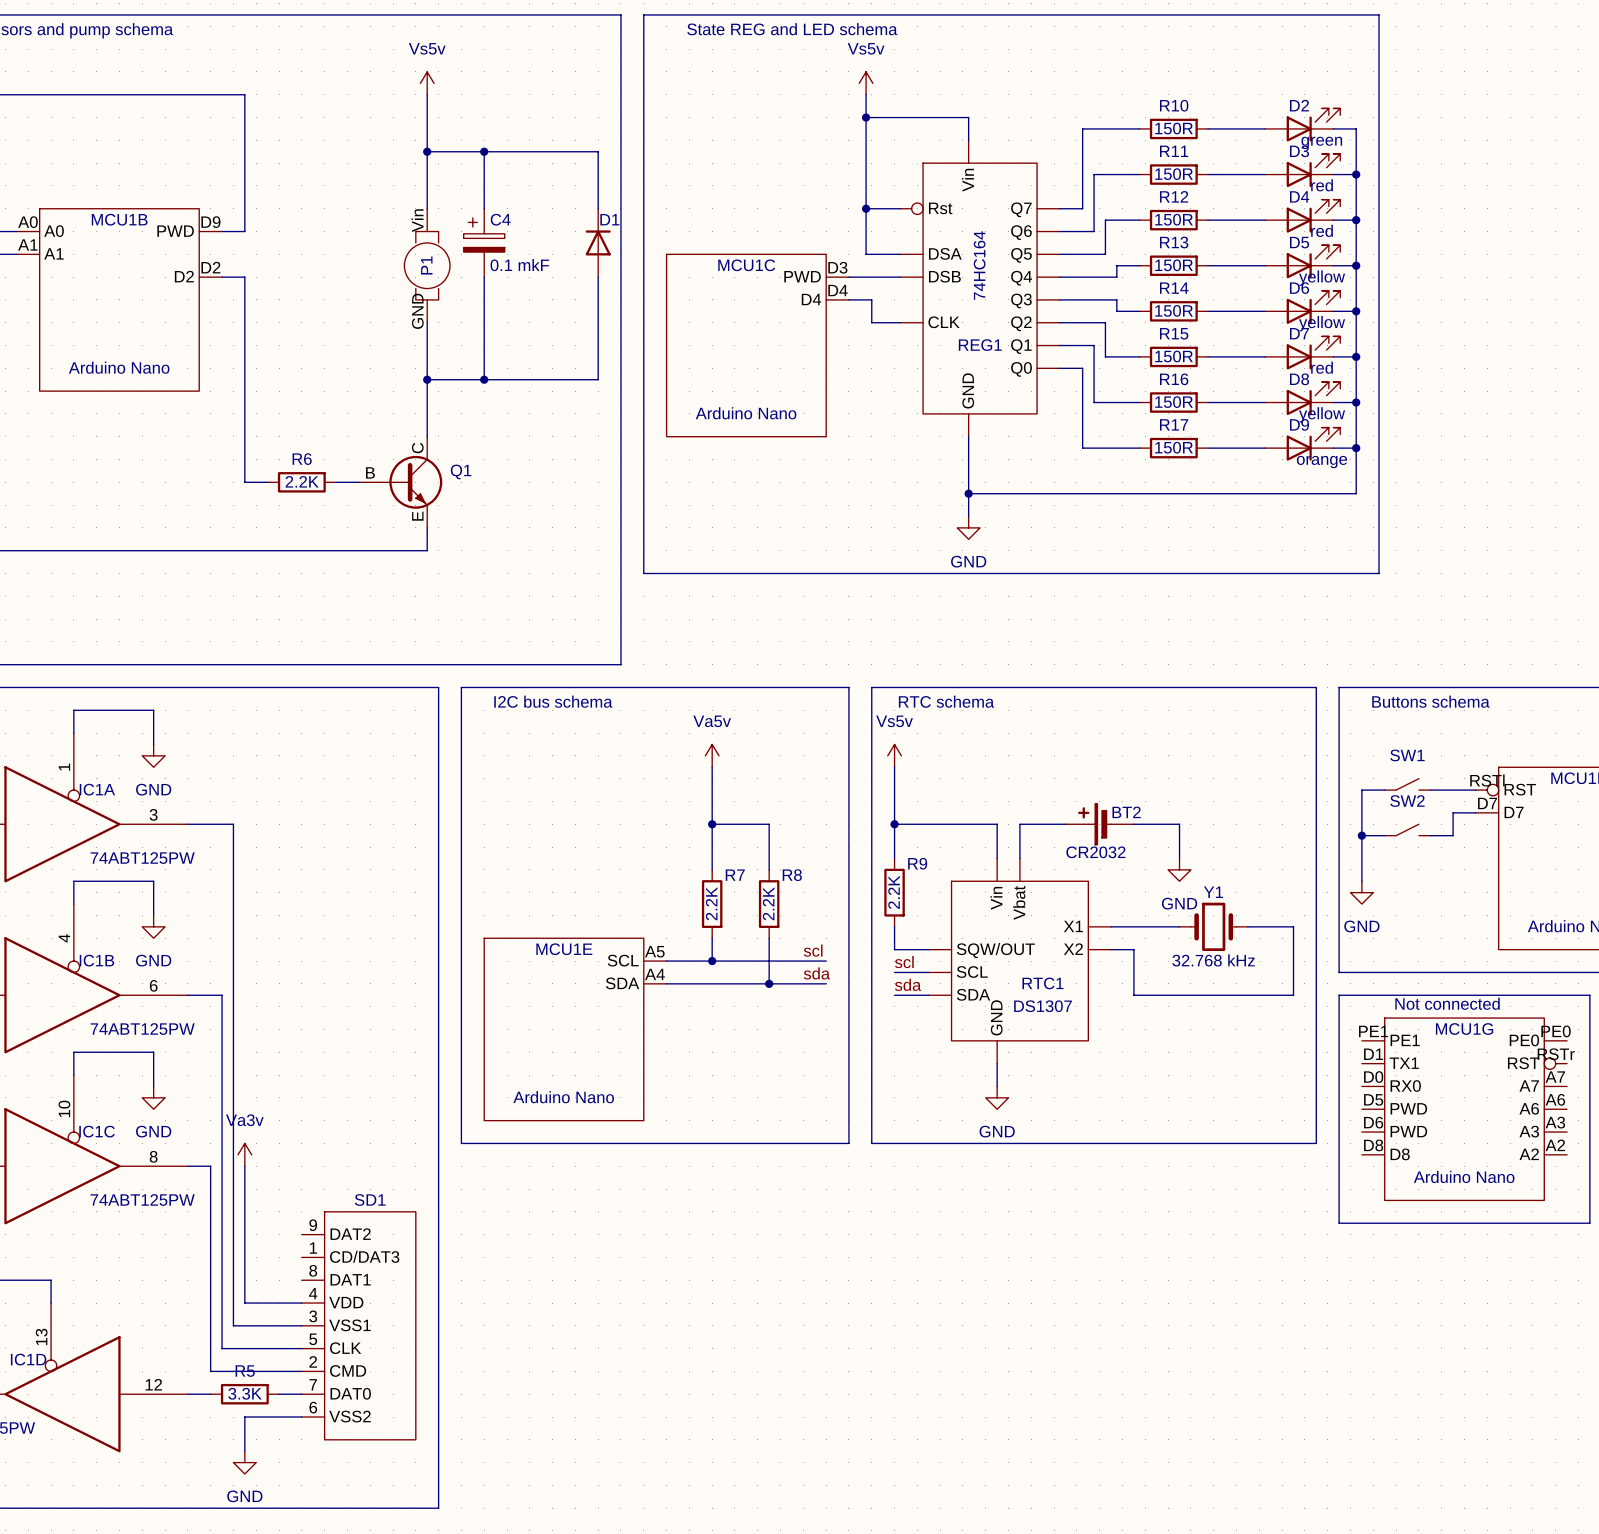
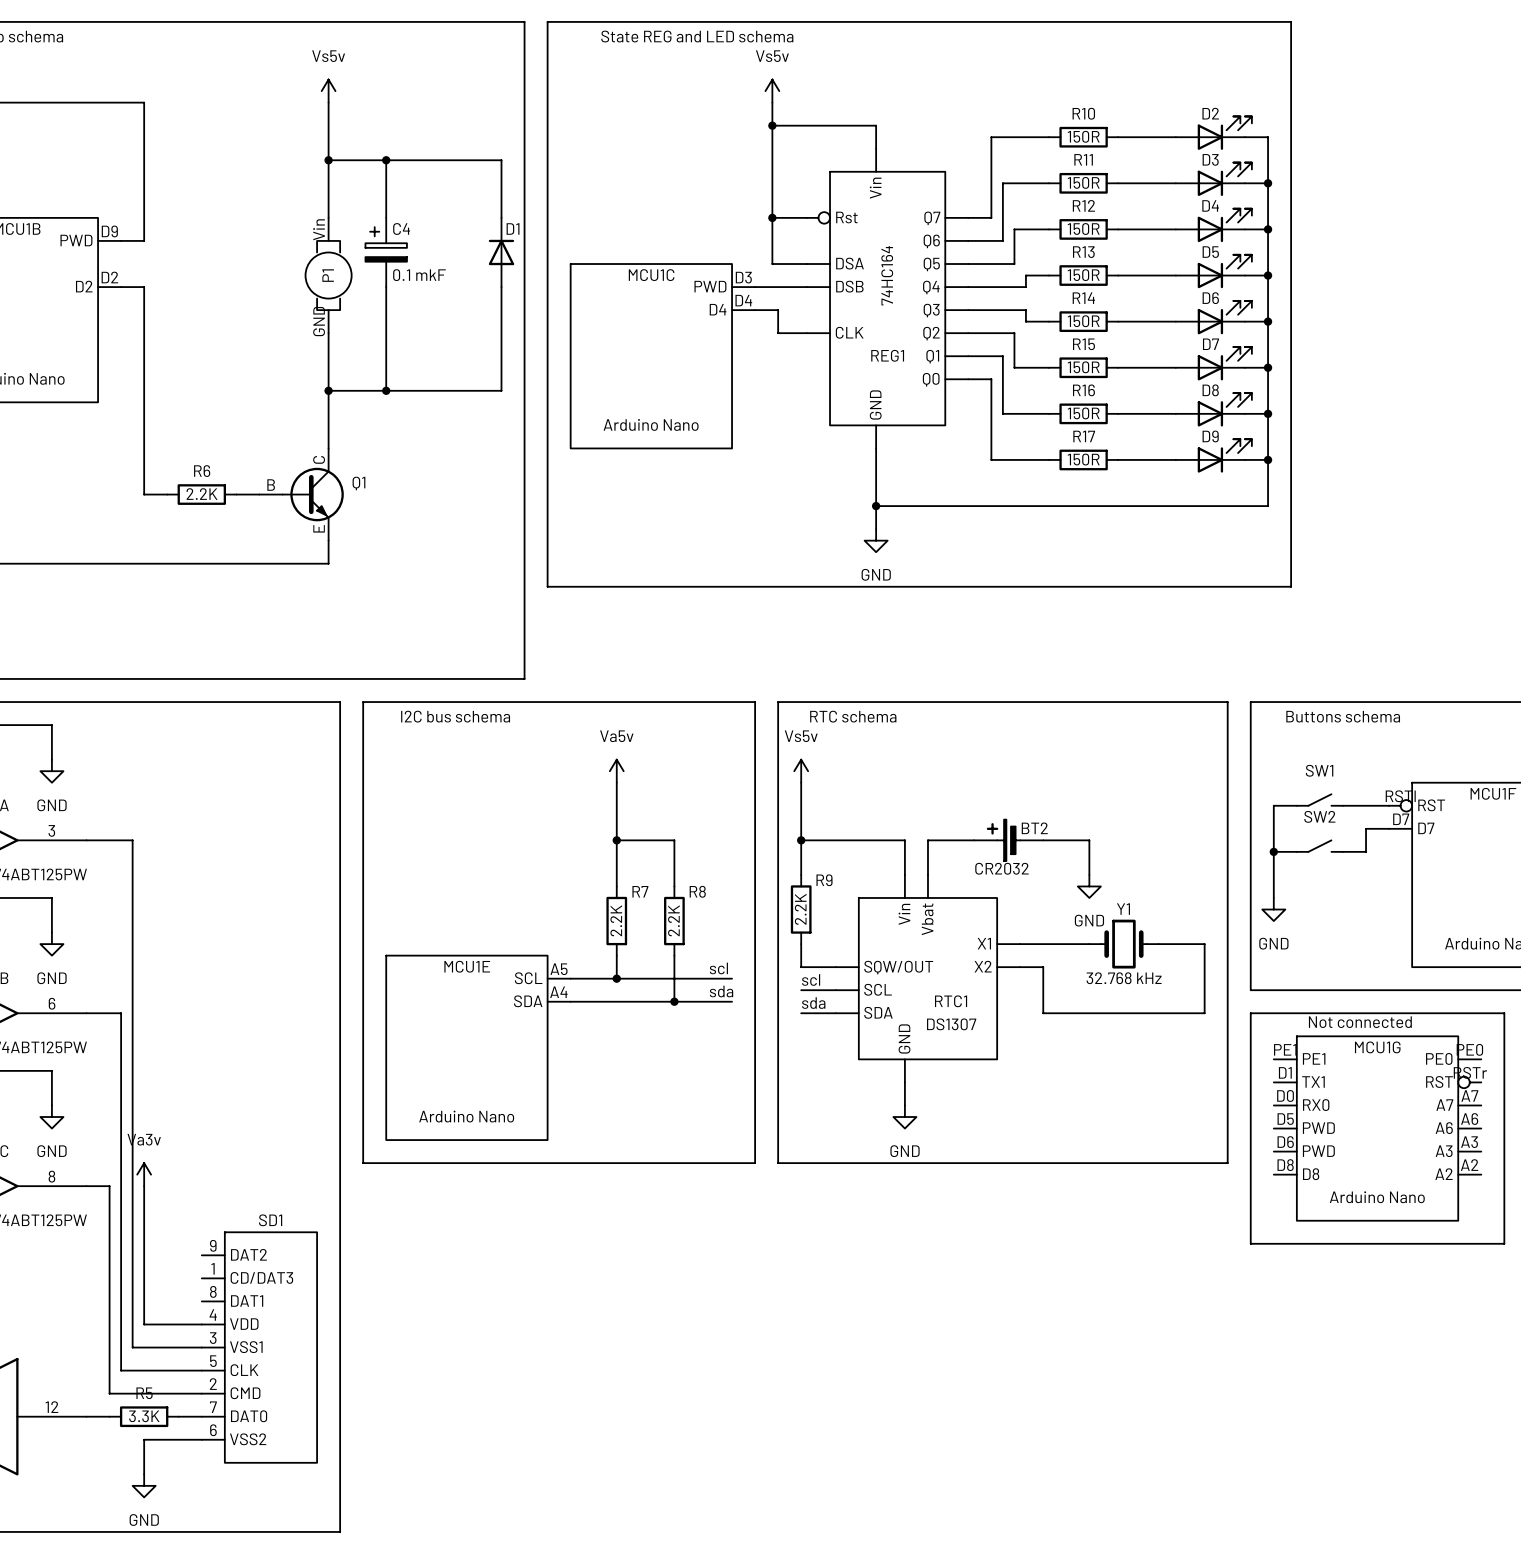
D2 value: green (1321, 142) -> none
D3 value: red (1322, 185) -> none
D4 value: red (1322, 230) -> none
D5 value: yellow (1322, 278) -> none
D6 value: yellow (1322, 323) -> none
D7 value: red (1322, 367) -> none
D8 value: yellow (1322, 414) -> none
D9 value: orange (1321, 462) -> none

